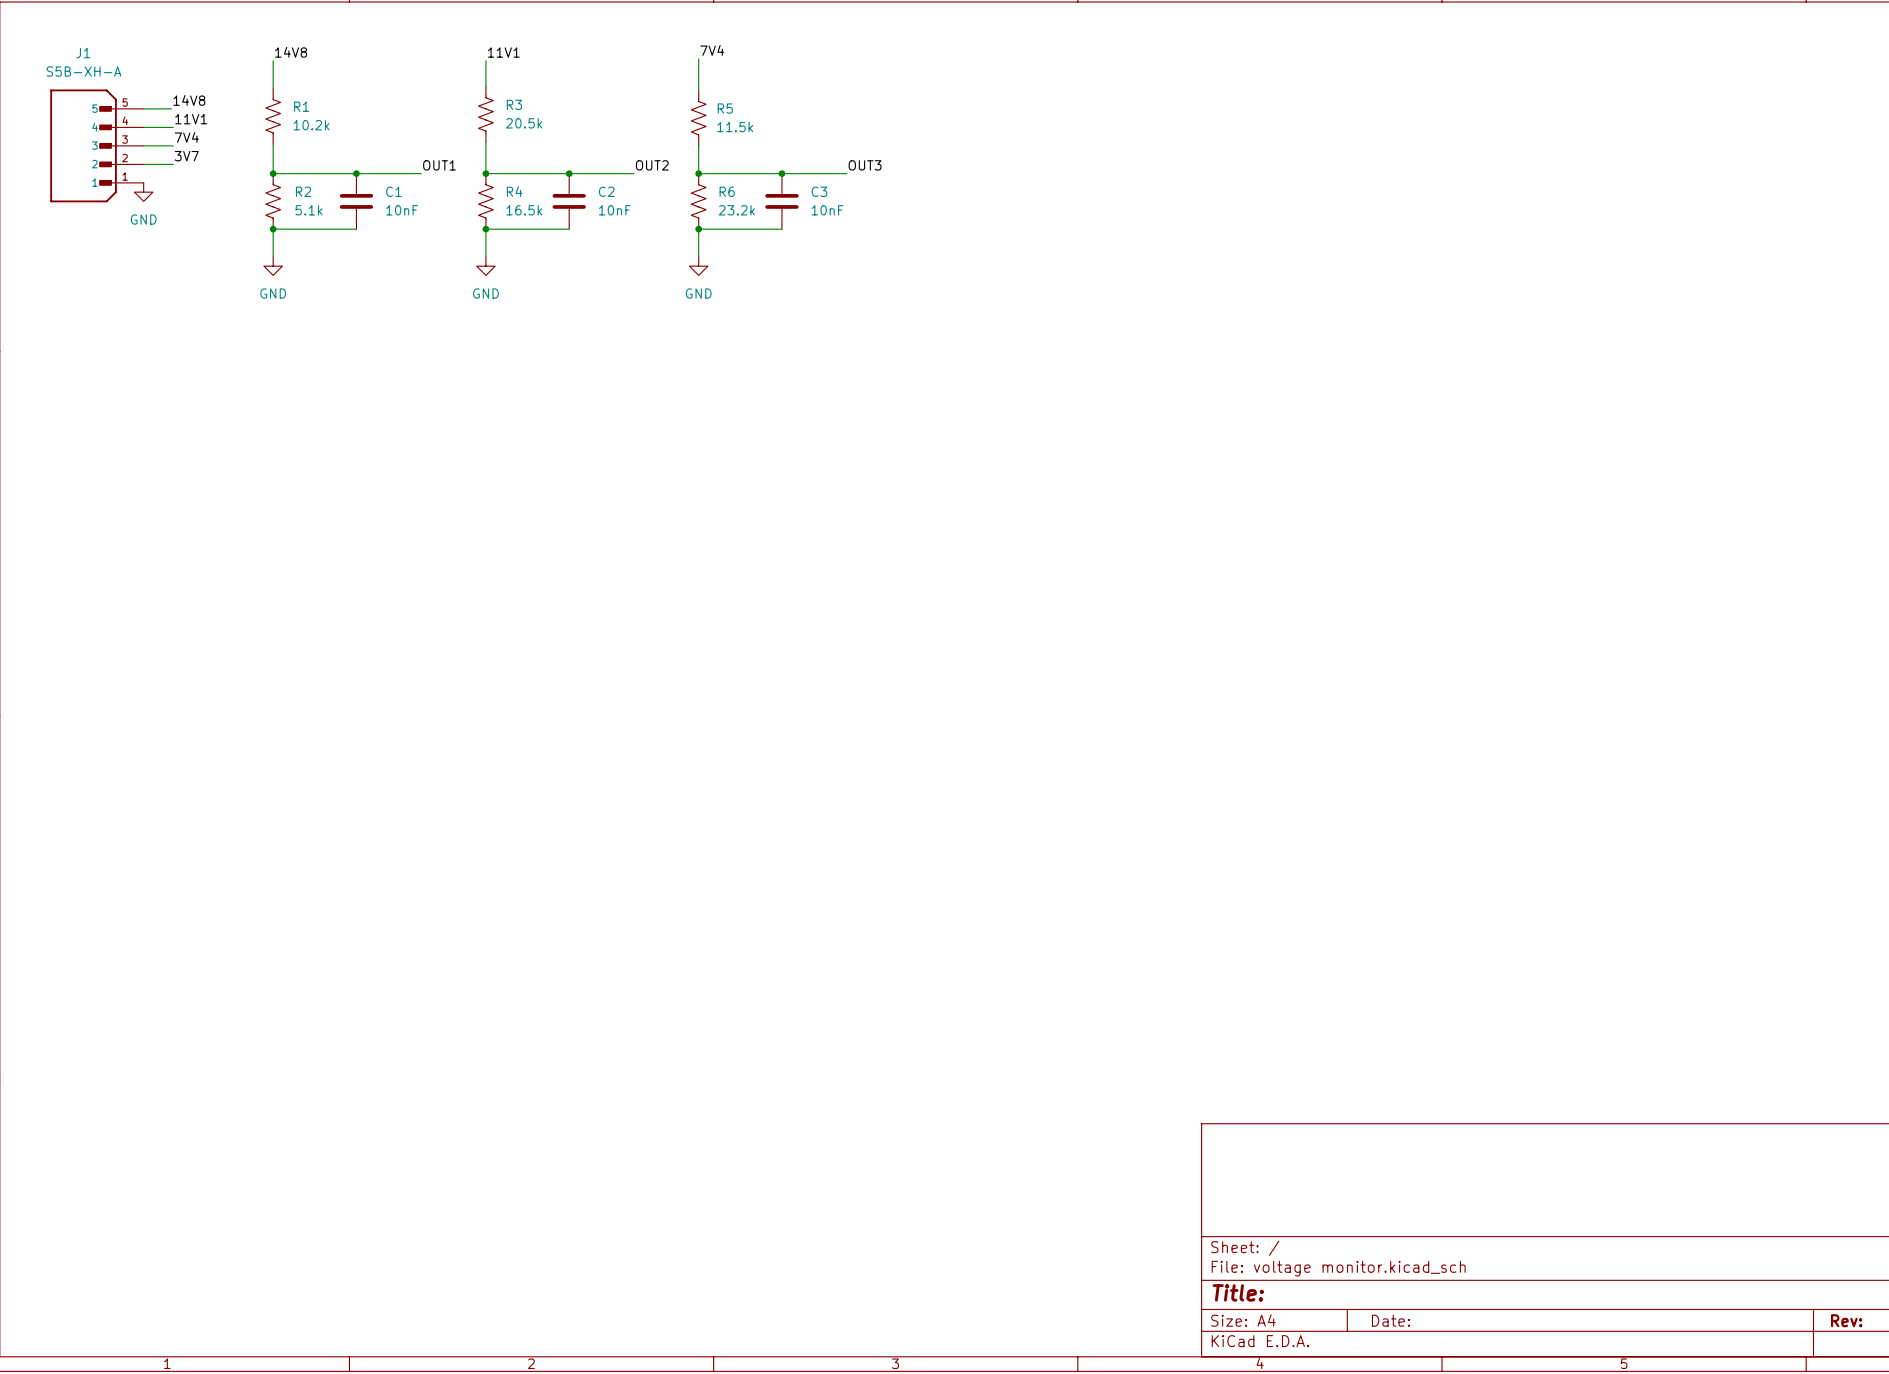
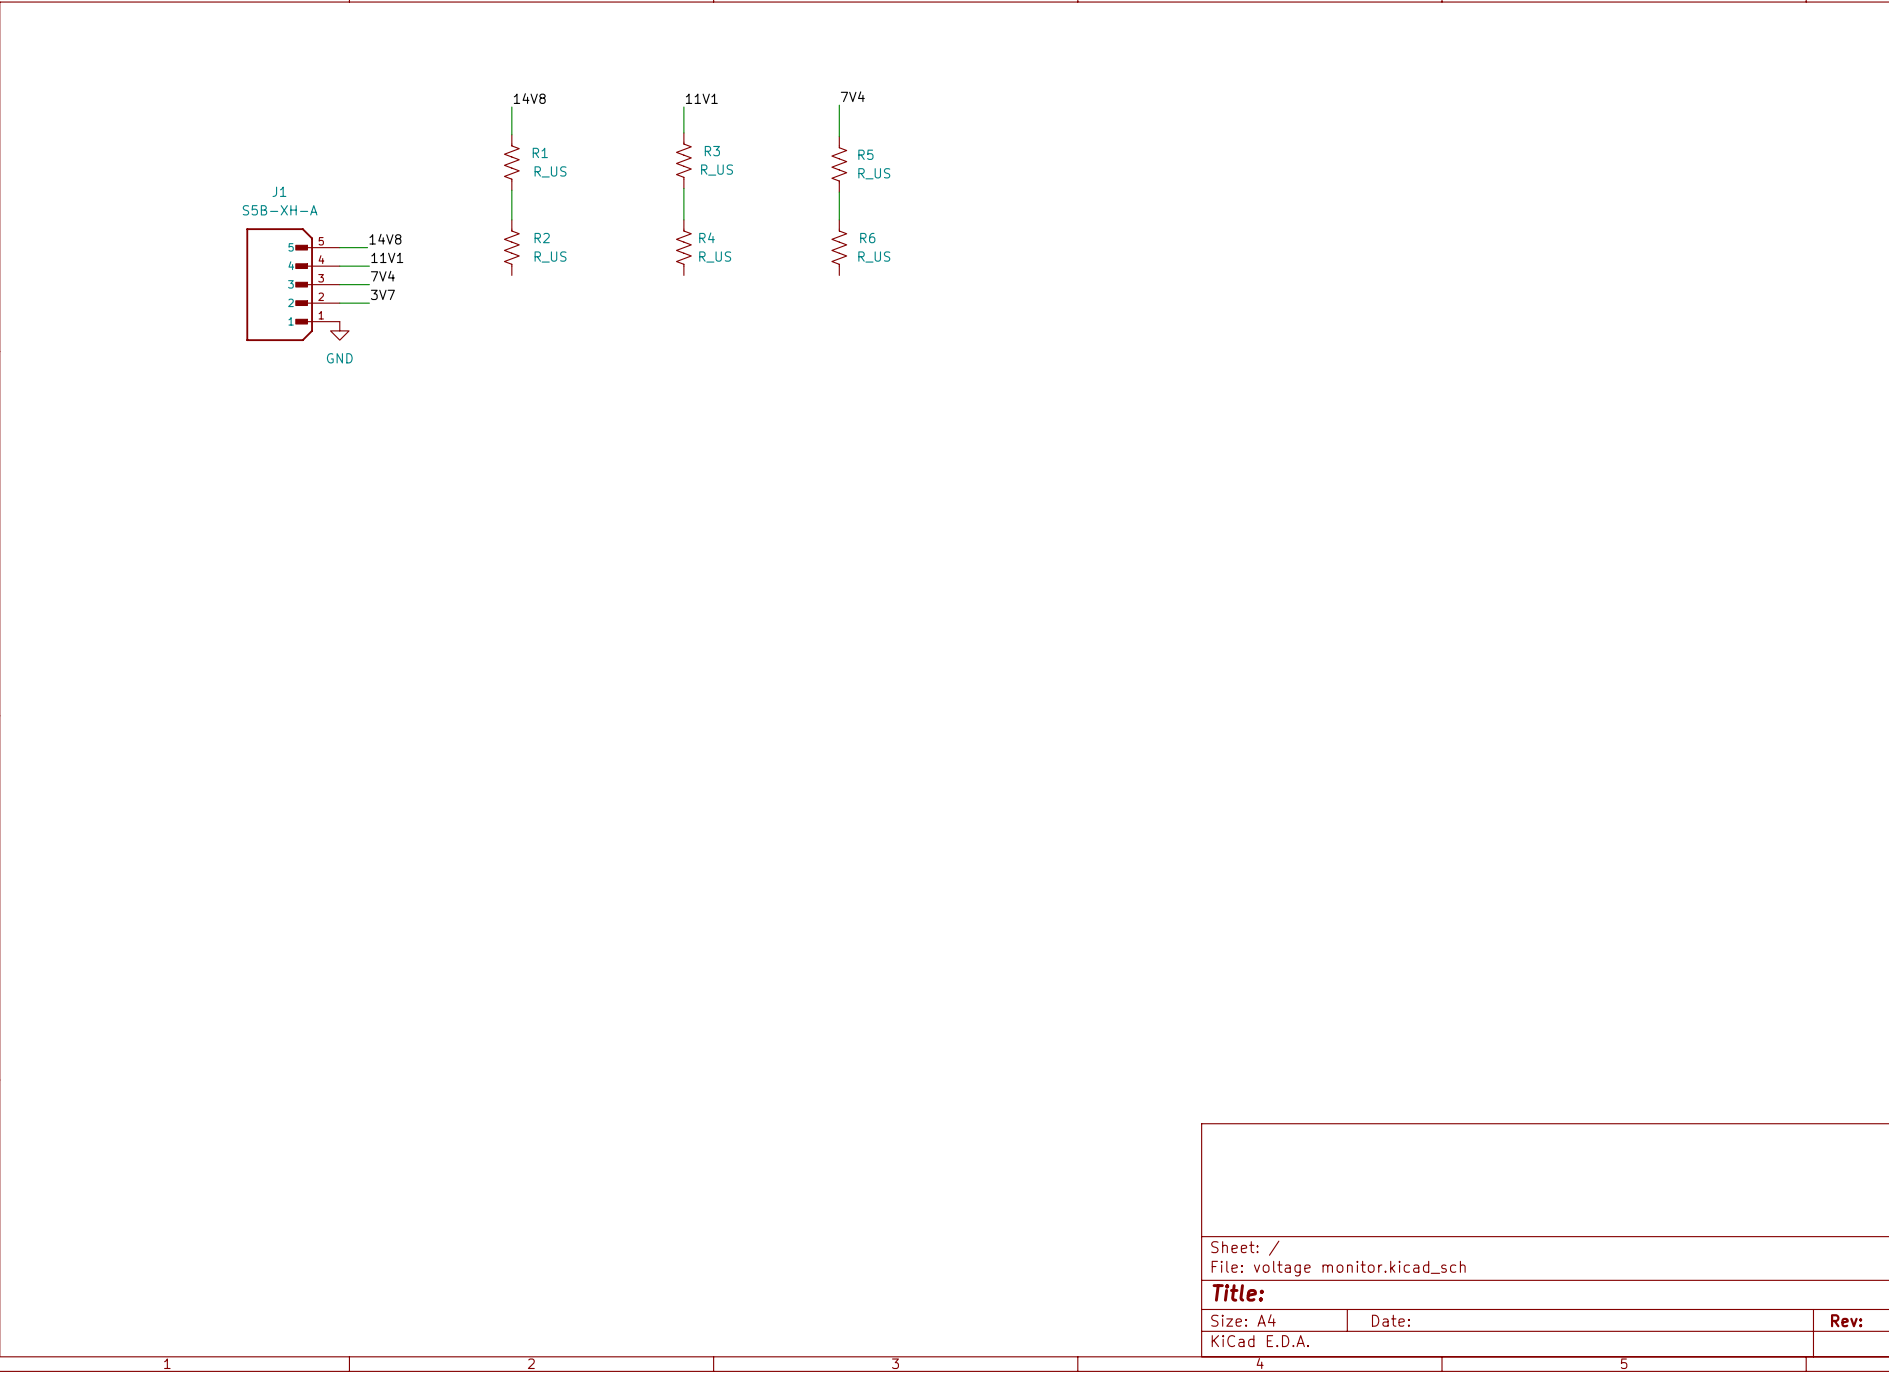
label position: 7V4 (712, 50) -> 7V4 (852, 96)
label: 14V8 (291, 52) -> none
label: 11V1 (503, 52) -> none
wire: (698, 58) (698, 90) -> (683, 188) (683, 219)
wire: (273, 60) (273, 88) -> none
wire: (485, 60) (485, 86) -> none
label: none -> 14V8 (529, 98)
label: none -> 11V1 (701, 98)
label: 14V8 (189, 100) -> none
wire: none -> (839, 105) (839, 136)
wire: none -> (511, 107) (511, 134)
wire: none -> (683, 107) (683, 132)
wire: (143, 108) (171, 108) -> none
R3 position: (485, 114) -> (683, 160)
R1 position: (273, 116) -> (511, 162)
R5 position: (698, 118) -> (839, 164)
label: 11V1 (191, 119) -> none
R3 value: 20.5k (524, 123) -> R_US (717, 170)
R1 value: 10.2k (311, 125) -> R_US (550, 171)
wire: (143, 127) (173, 127) -> none
R5 value: 11.5k (735, 127) -> R_US (874, 173)
label: 7V4 (186, 137) -> none
wire: (485, 142) (485, 173) (633, 173) -> none
wire: (273, 144) (273, 173) (421, 173) -> none
J1 position: (96, 145) -> (293, 284)
wire: (143, 145) (173, 145) -> none
wire: (698, 145) (698, 173) (846, 173) -> none
label: 3V7 (186, 156) -> none
wire: (143, 164) (173, 164) -> none
label: OUT1 (439, 165) -> none
label: OUT2 (652, 165) -> none
label: OUT3 (865, 165) -> none
junction: (273, 173) -> none
junction: (356, 173) -> none
junction: (485, 173) -> none
junction: (569, 173) -> none
junction: (698, 173) -> none
junction: (781, 173) -> none
wire: none -> (511, 190) (511, 219)
R4 name position: R4 (514, 191) -> R4 (707, 237)
power symbol: GND (143, 192) -> none
wire: none -> (839, 192) (839, 219)
R2 position: (273, 201) -> (511, 247)
C1: 10nF (356, 201) -> none
R4 position: (485, 201) -> (683, 247)
C2: 10nF (569, 201) -> none
R6 position: (698, 201) -> (839, 247)
C3: 10nF (781, 201) -> none
R2 value: 5.1k (309, 210) -> R_US (550, 256)
R4 value: 16.5k (524, 210) -> R_US (715, 256)
R6 value: 23.2k (736, 210) -> R_US (874, 256)
junction: (273, 229) -> none
wire: (356, 229) (273, 229) (273, 256) -> none
junction: (485, 229) -> none
wire: (569, 229) (485, 229) (485, 256) -> none
junction: (698, 229) -> none
wire: (781, 229) (698, 229) (698, 256) -> none
label: none -> 14V8 (385, 239)
wire: none -> (339, 247) (367, 247)
label: none -> 11V1 (387, 257)
power symbol: GND (273, 266) -> none
wire: none -> (339, 266) (369, 266)
power symbol: GND (485, 266) -> none
power symbol: GND (698, 266) -> none
label: none -> 7V4 (382, 276)
wire: none -> (339, 284) (369, 284)
label: none -> 3V7 (382, 294)
wire: none -> (339, 303) (369, 303)
power symbol: none -> GND (339, 330)

